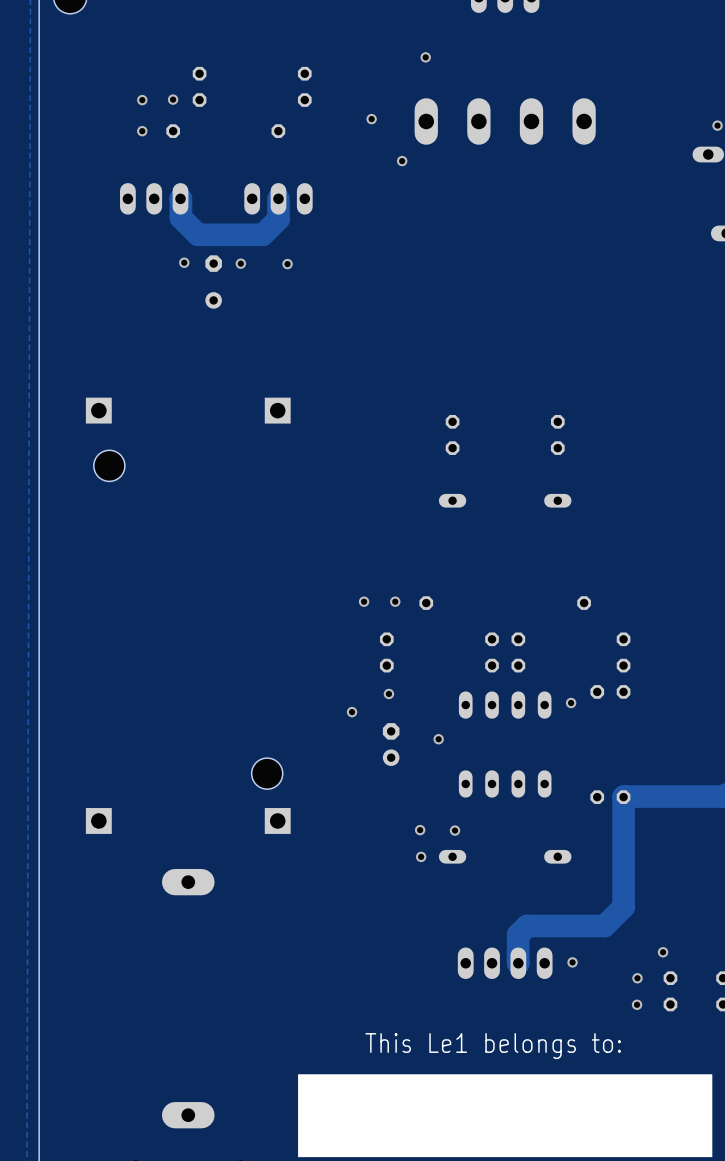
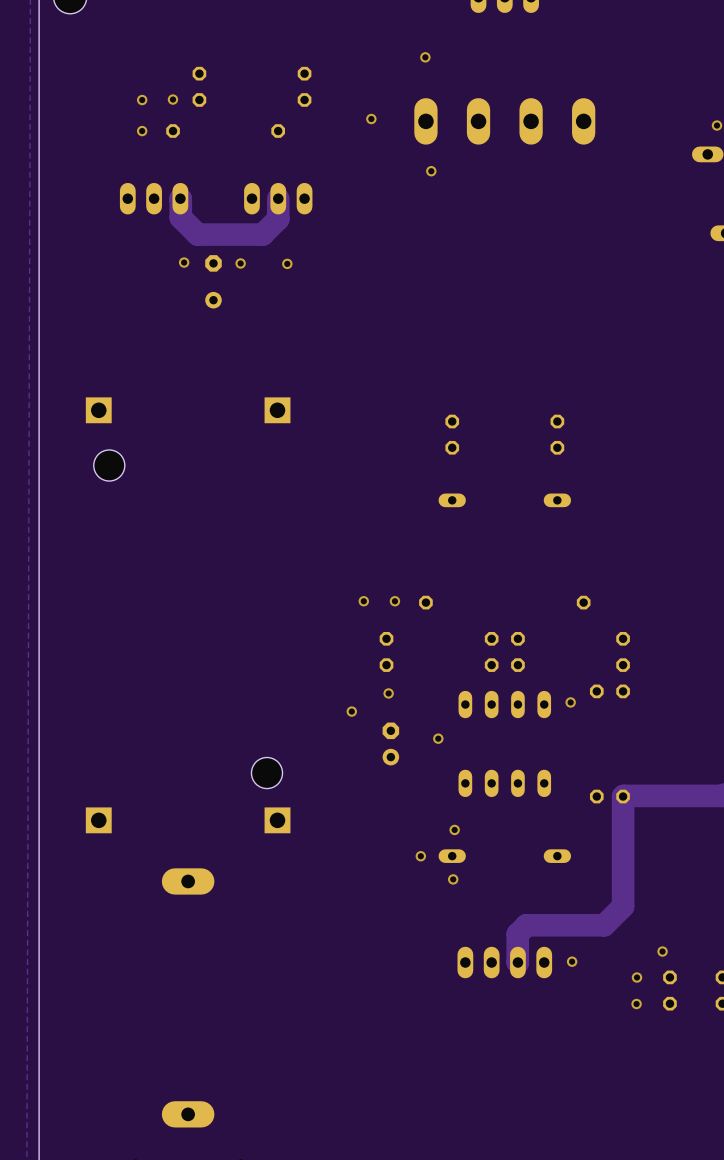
via position: (402, 161) -> (431, 171)
via position: (420, 830) -> (453, 879)
text: This Le1 belongs to: (493, 1046) -> none
drawing: [298, 1074, 713, 1158] -> none

